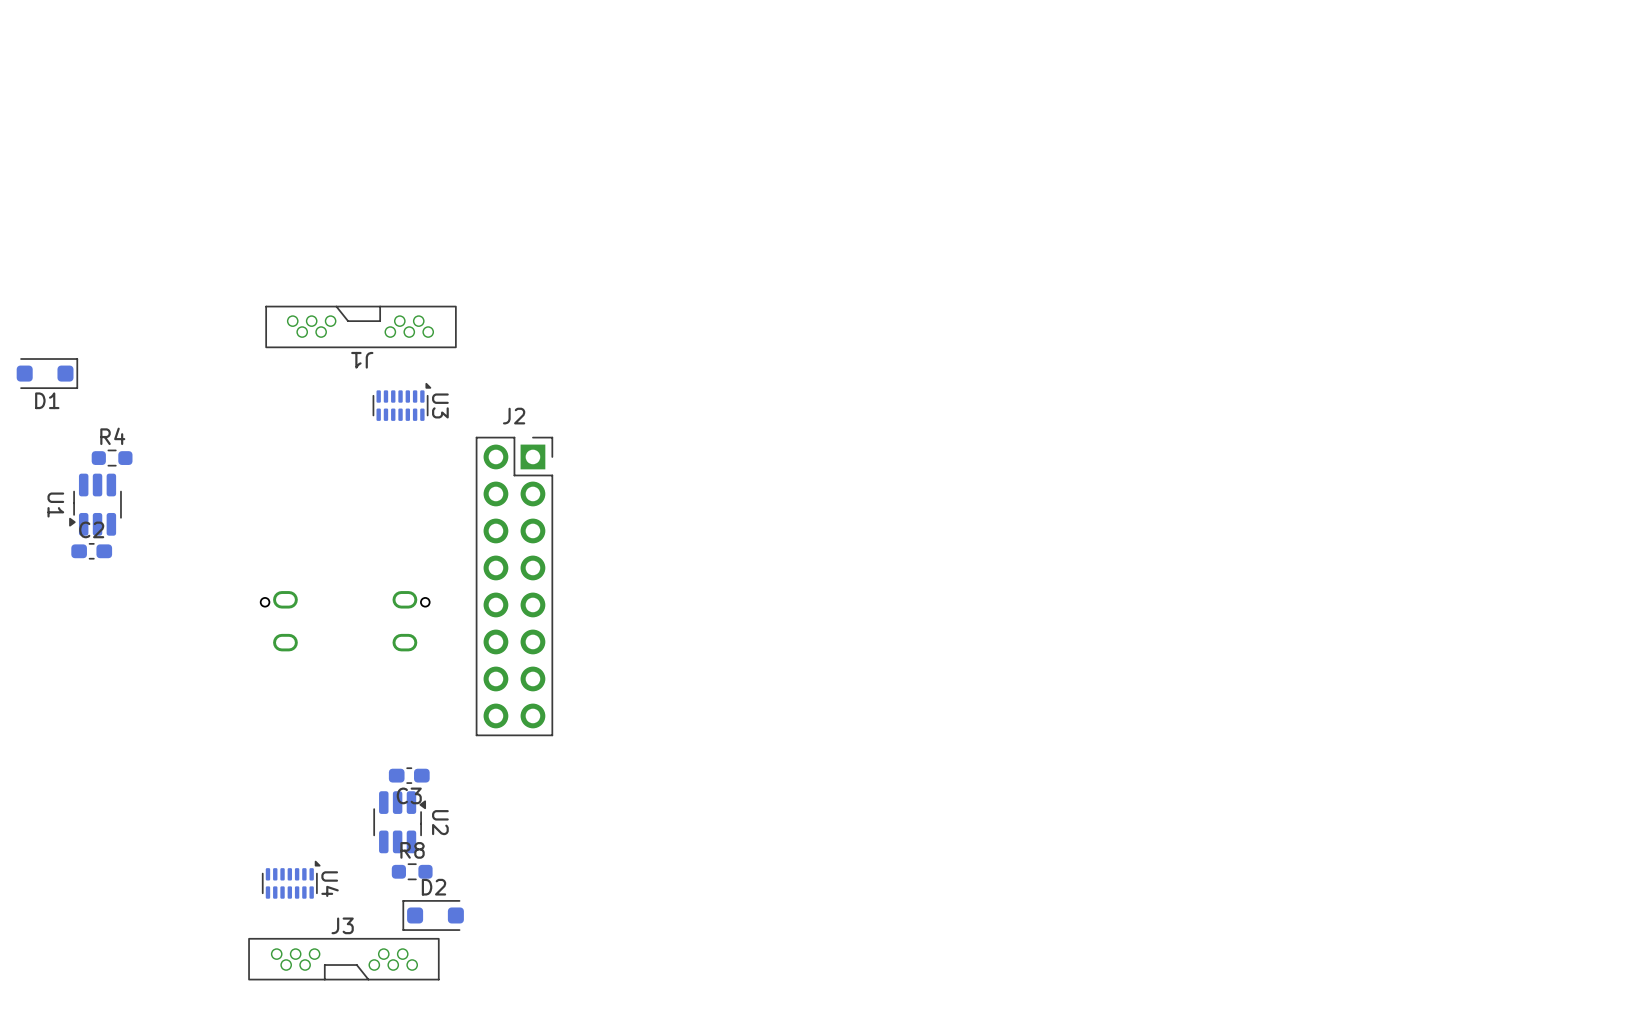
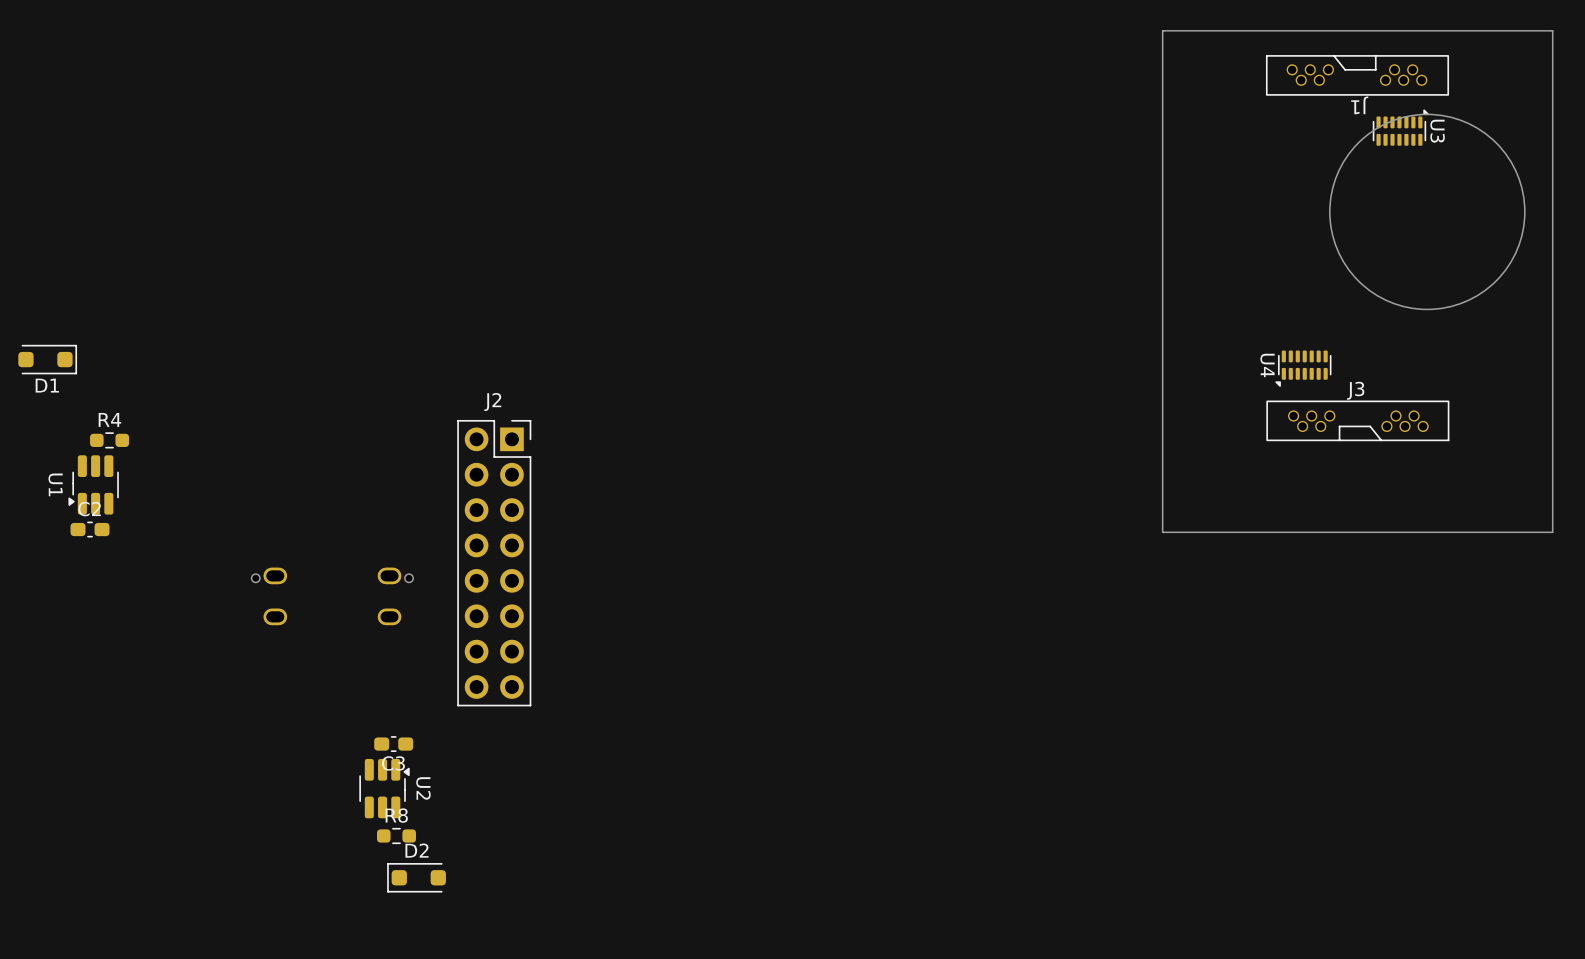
board edge: none -> (1552, 30) (1162, 30) (1162, 532) (1552, 532) (1552, 30)
round board edge: none -> [1329, 114, 1526, 310]
J1 position: (361, 326) -> (1357, 75)
U3 position: (401, 401) -> (1400, 127)
U4 rotation: 0° (291, 879) -> 180° (1303, 368)
U4 position: (291, 879) -> (1303, 368)
J3 position: (343, 959) -> (1357, 420)

